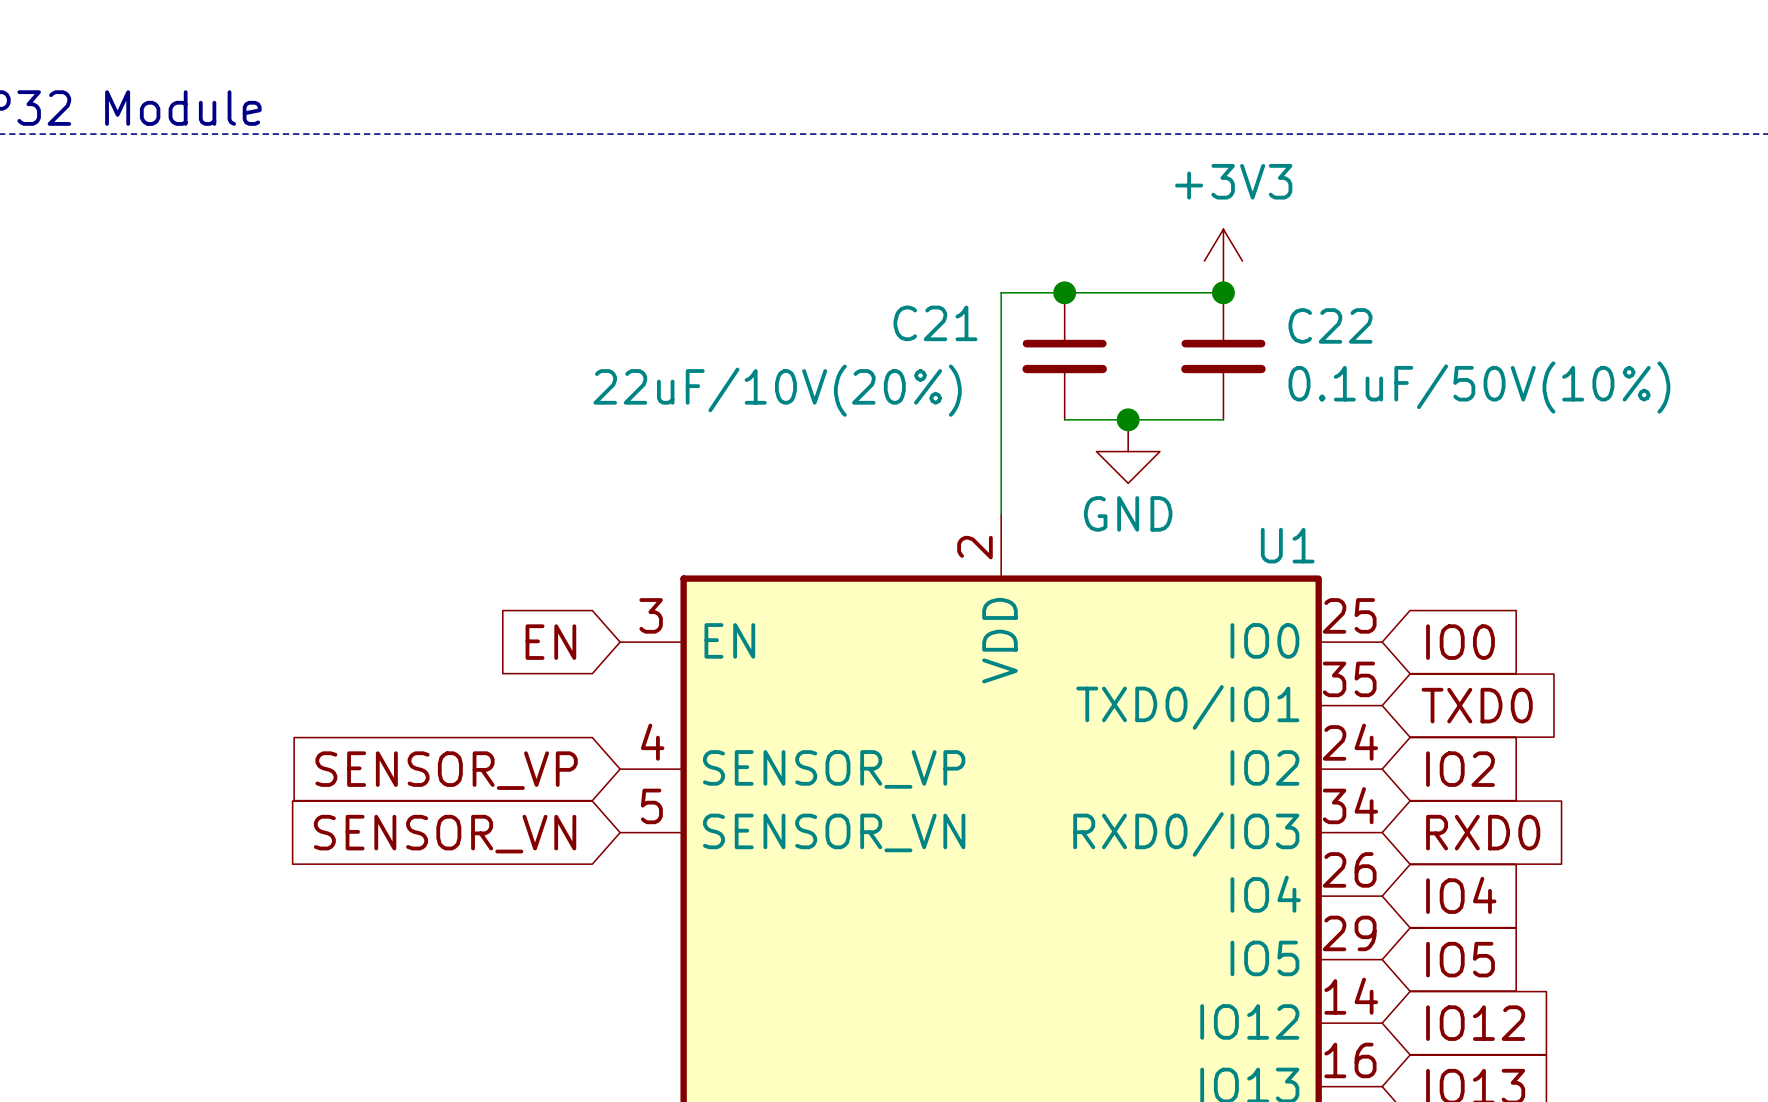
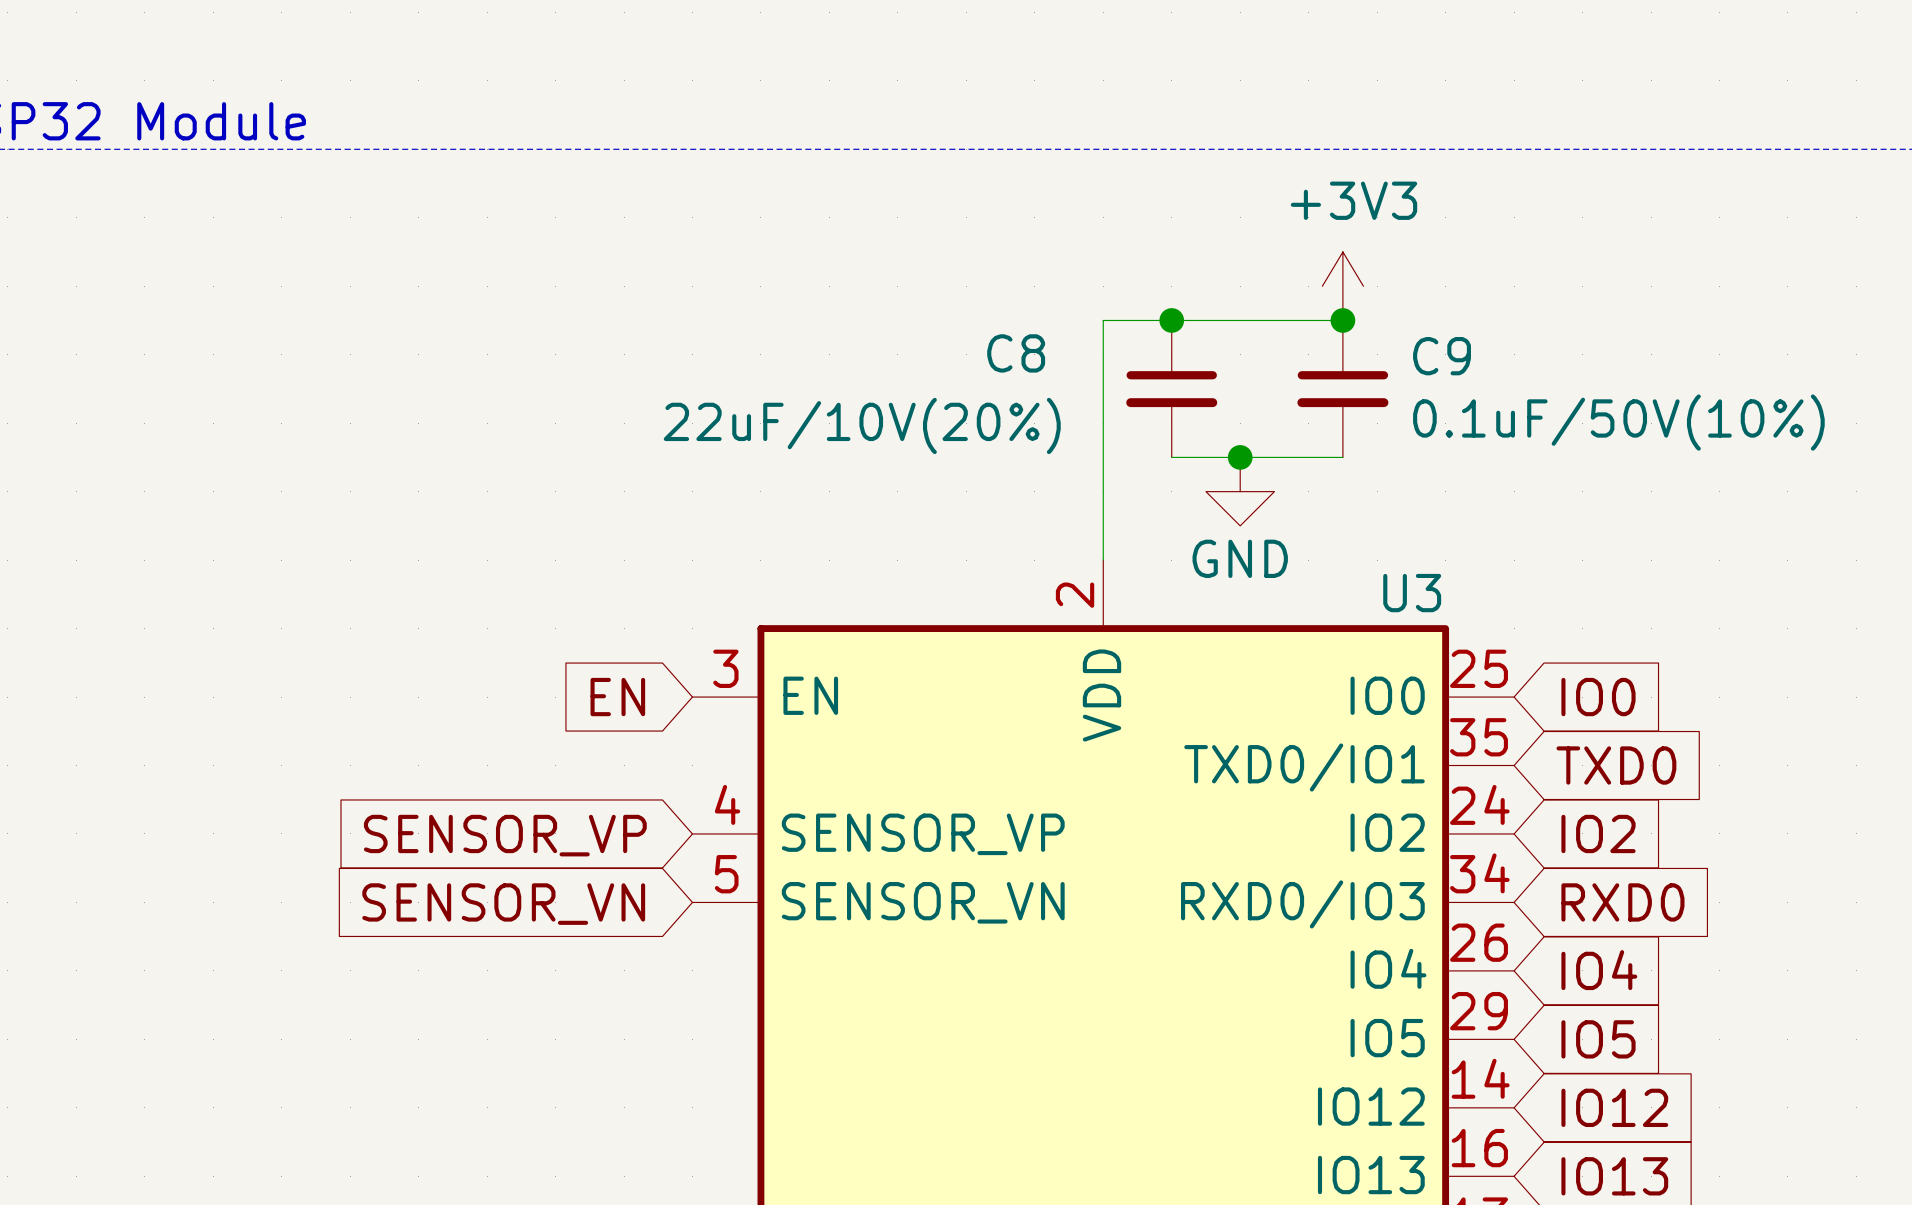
C21 name: C21 (935, 323) -> C8 (1016, 353)
C22 name: C22 (1330, 325) -> C9 (1442, 356)
U1 name: U1 (1287, 545) -> U3 (1412, 593)

